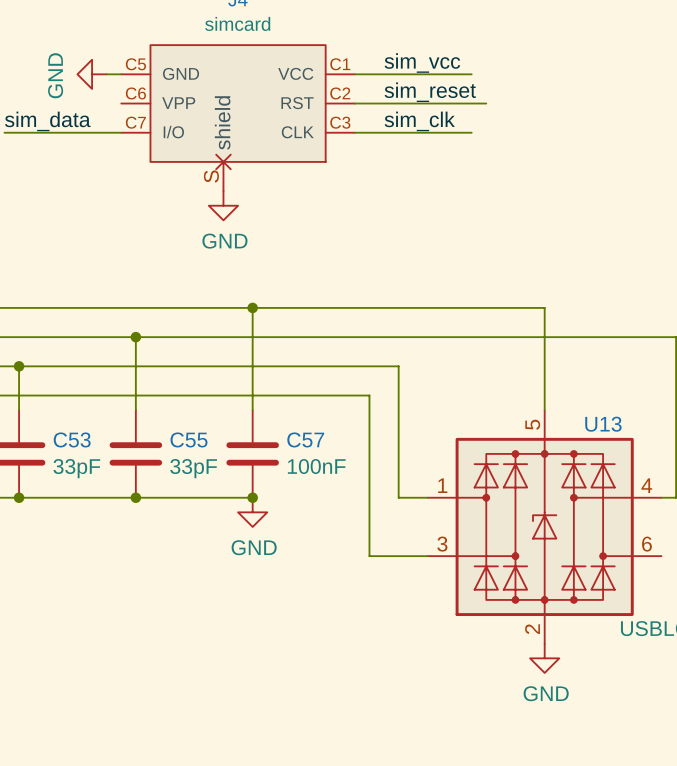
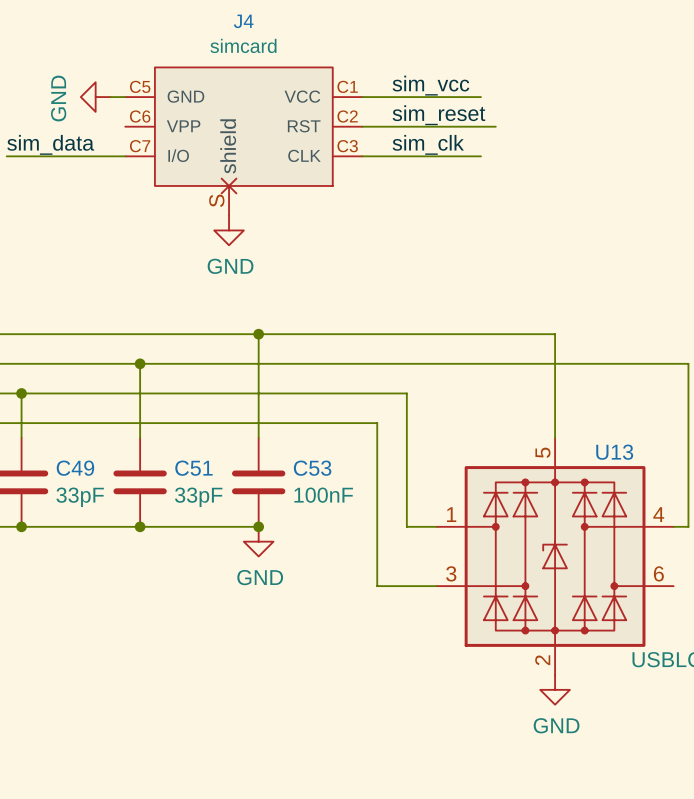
C53 name: C53 (72, 439) -> C49 (75, 468)
C55 name: C55 (189, 439) -> C51 (193, 468)
C57 name: C57 (305, 439) -> C53 (312, 468)

